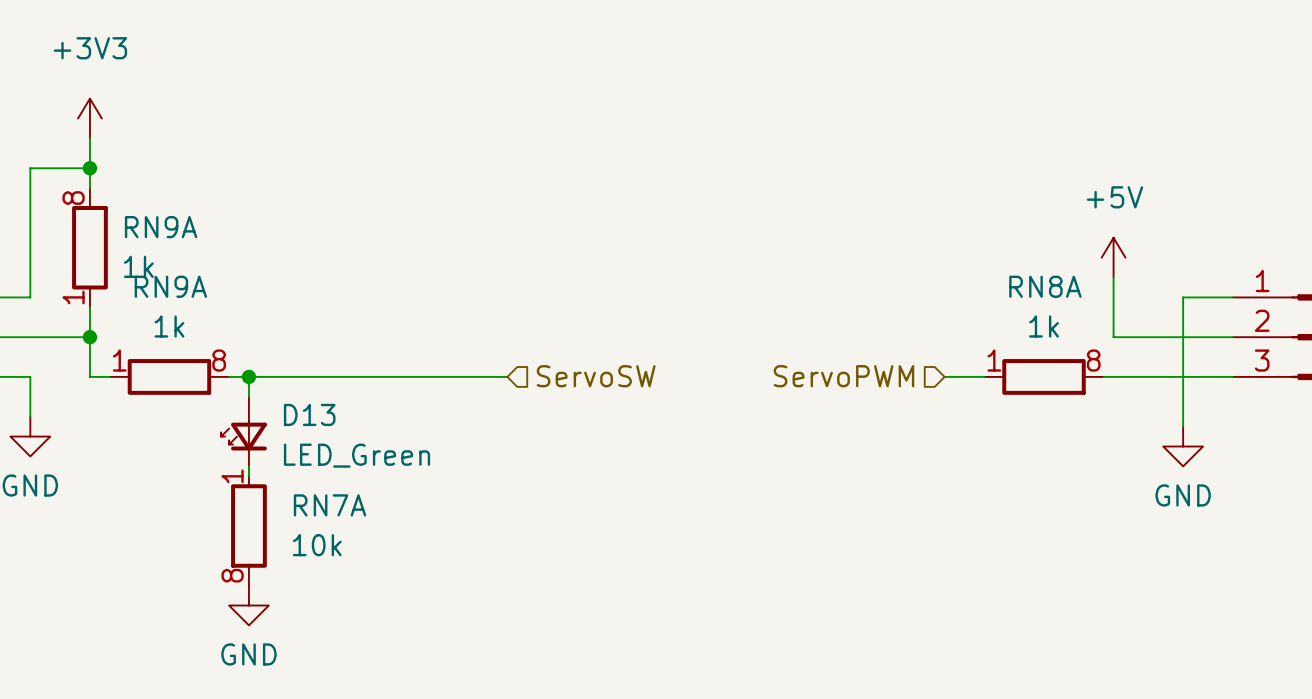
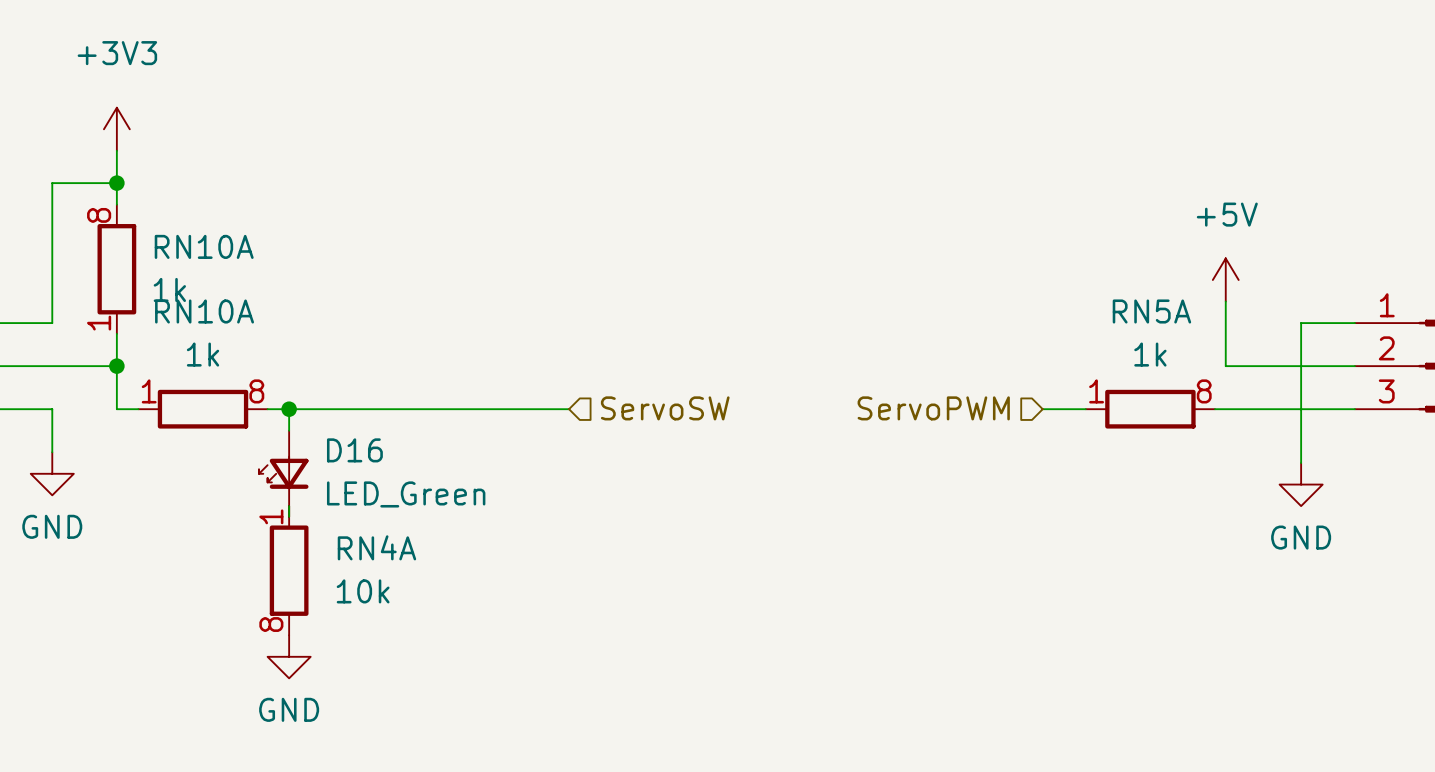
RN9A name: RN9A (161, 227) -> RN10A (204, 246)
RN9A name: RN9A (170, 286) -> RN10A (204, 311)
RN8A name: RN8A (1045, 286) -> RN5A (1151, 311)
D13 name: D13 (309, 414) -> D16 (354, 450)
RN7A name: RN7A (330, 505) -> RN4A (376, 547)

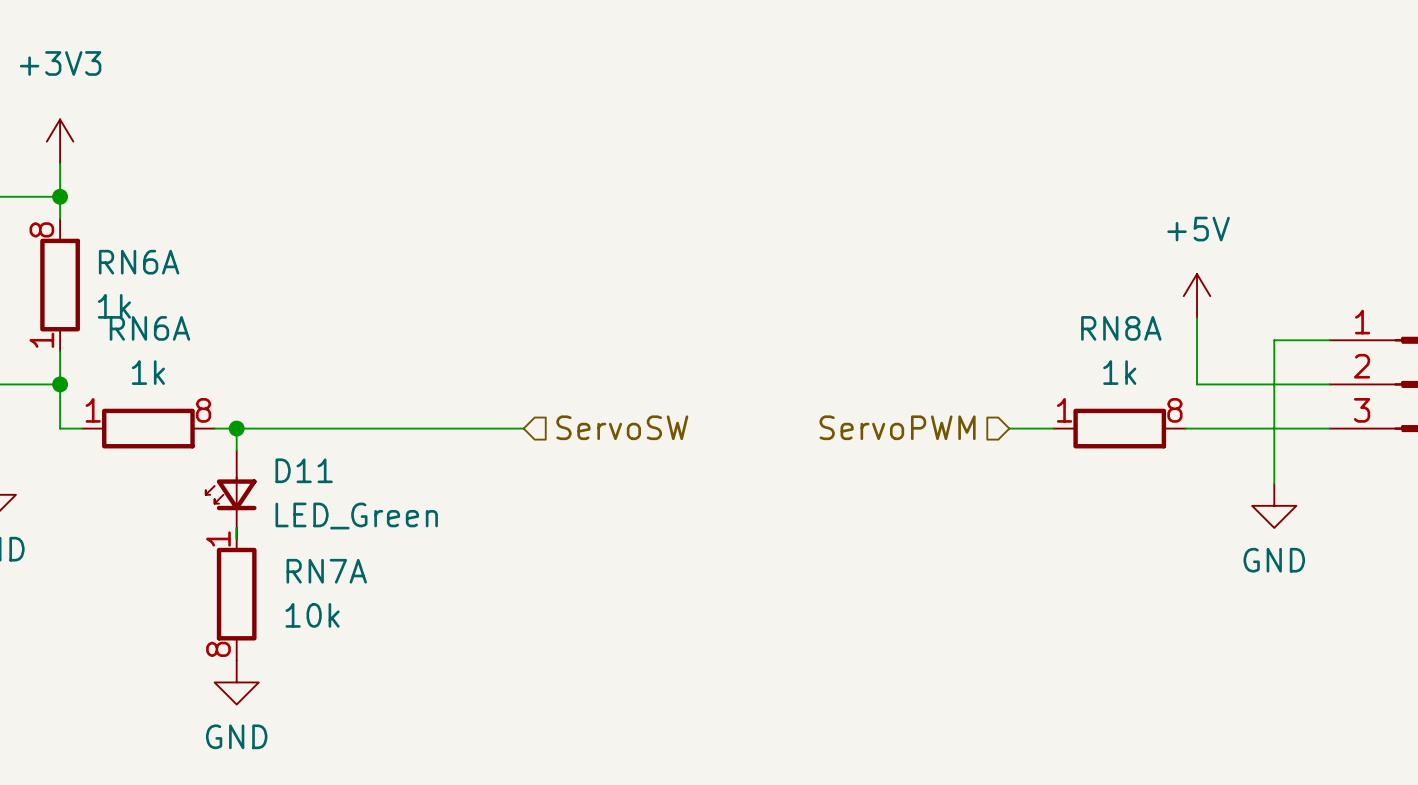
RN10A name: RN10A (204, 246) -> RN6A (139, 262)
RN10A name: RN10A (204, 311) -> RN6A (149, 328)
RN5A name: RN5A (1151, 311) -> RN8A (1121, 328)
D16 name: D16 (354, 450) -> D11 (304, 470)
RN4A name: RN4A (376, 547) -> RN7A (326, 571)

